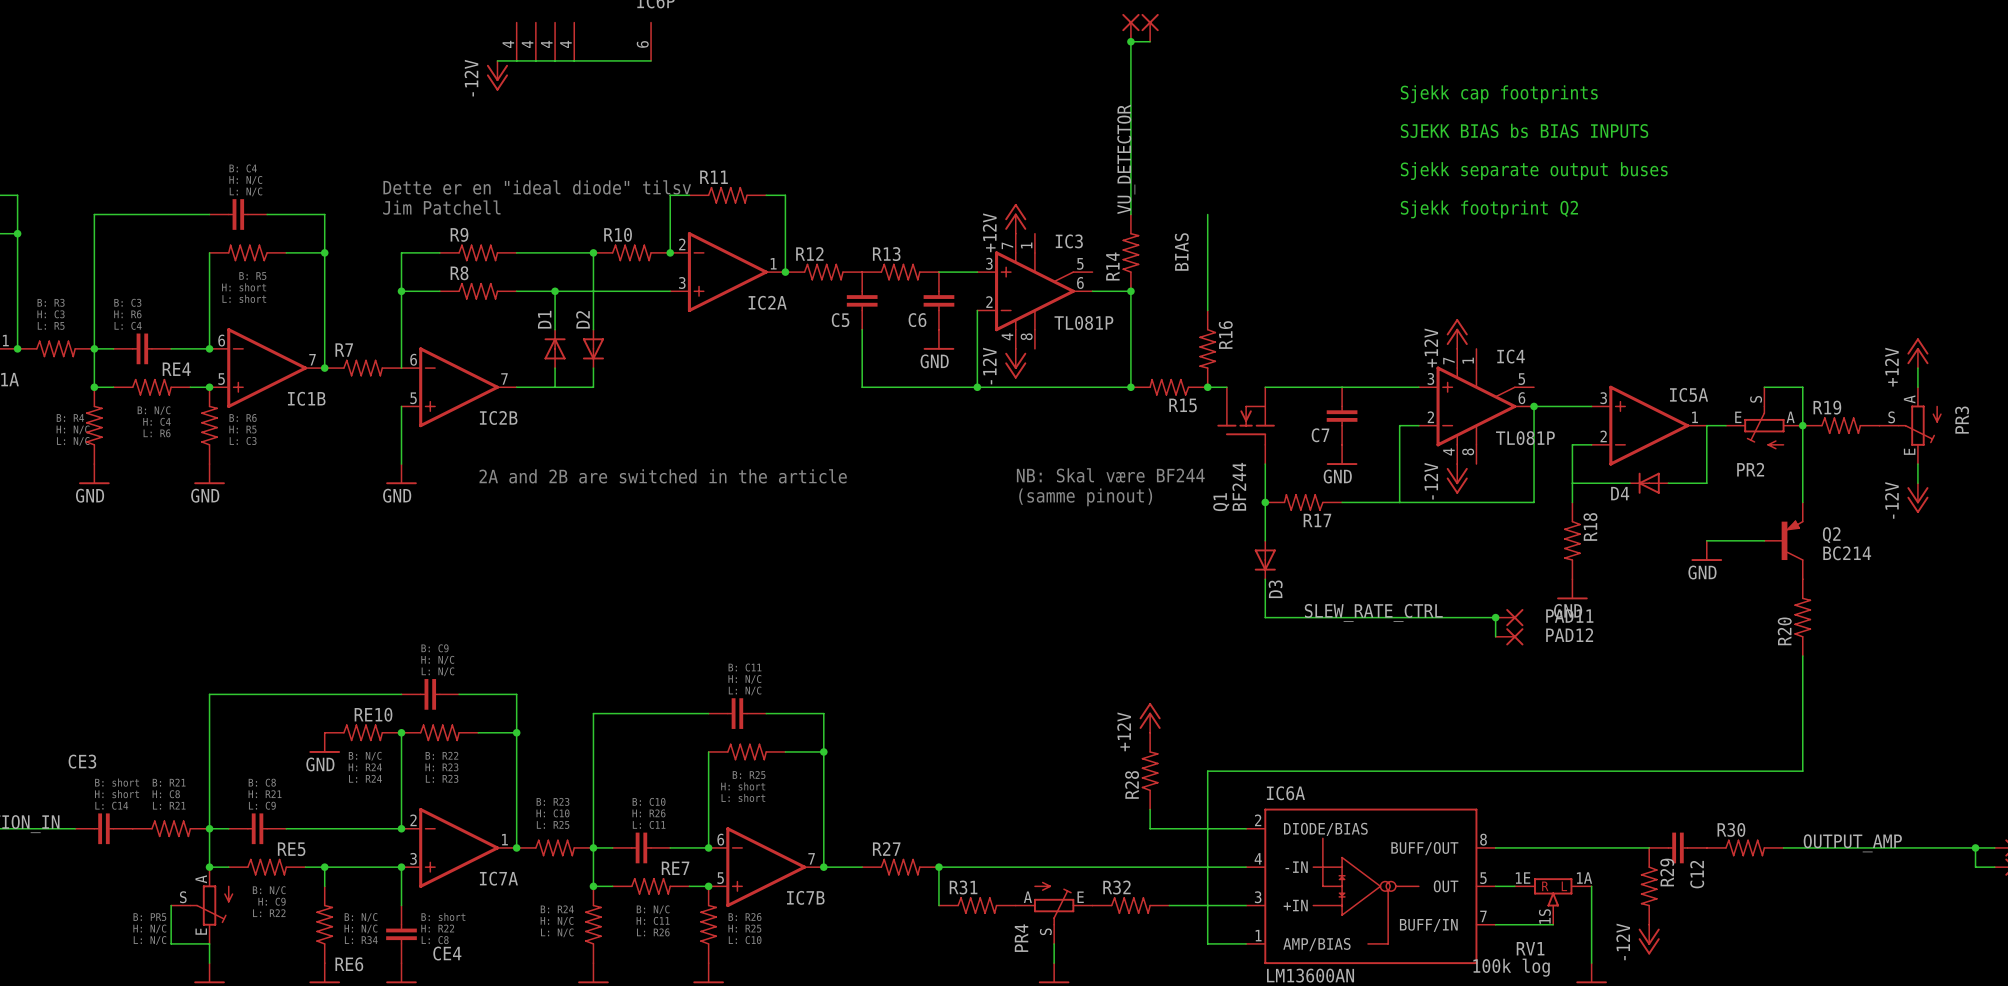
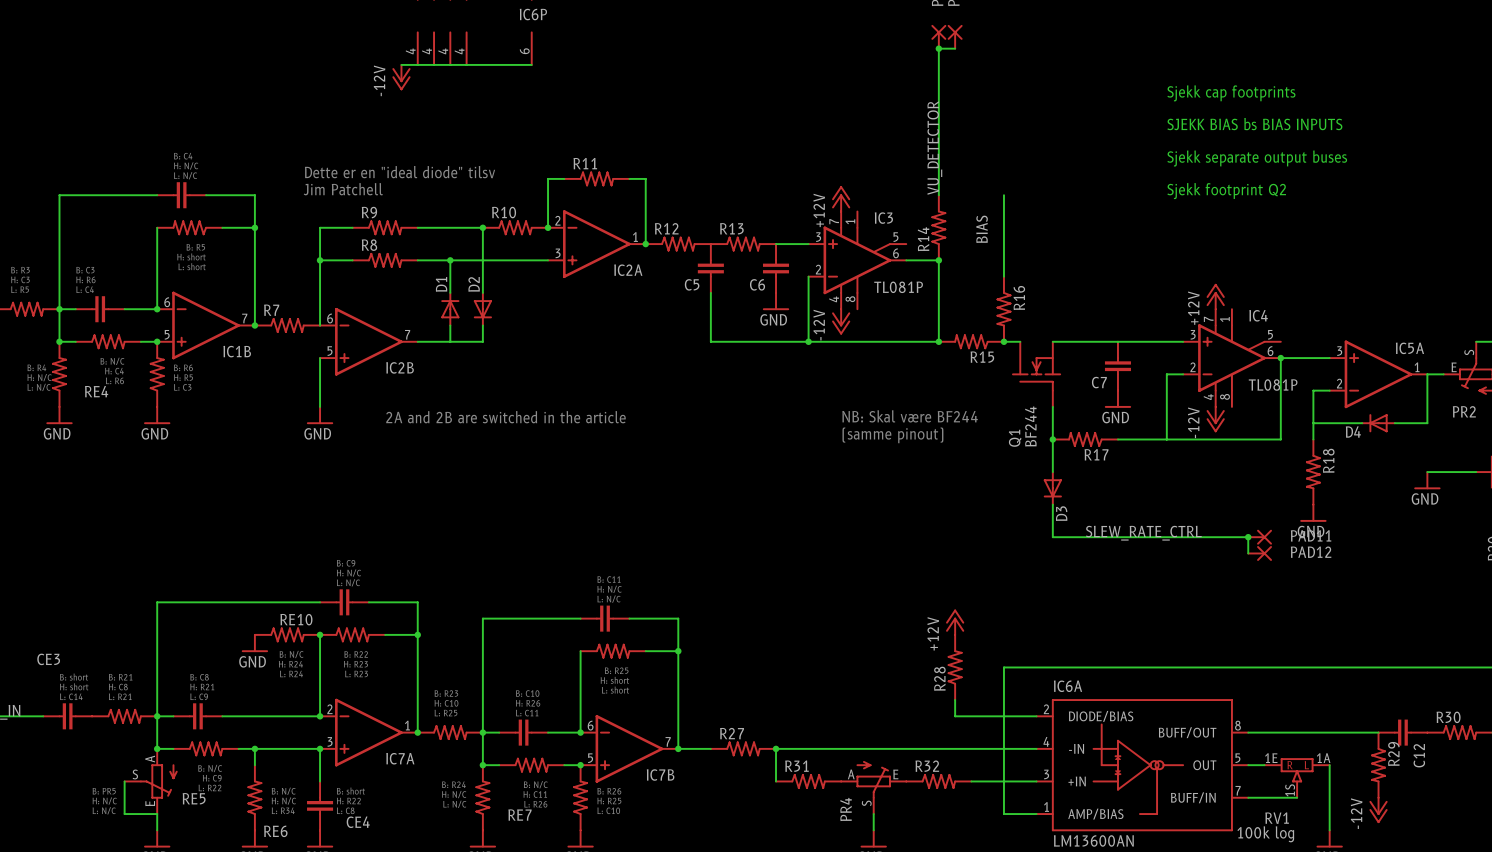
RE4 name position: RE4 (176, 369) -> RE4 (96, 391)
RE5 name position: RE5 (291, 849) -> RE5 (194, 798)
RE7 name position: RE7 (675, 868) -> RE7 (519, 815)

